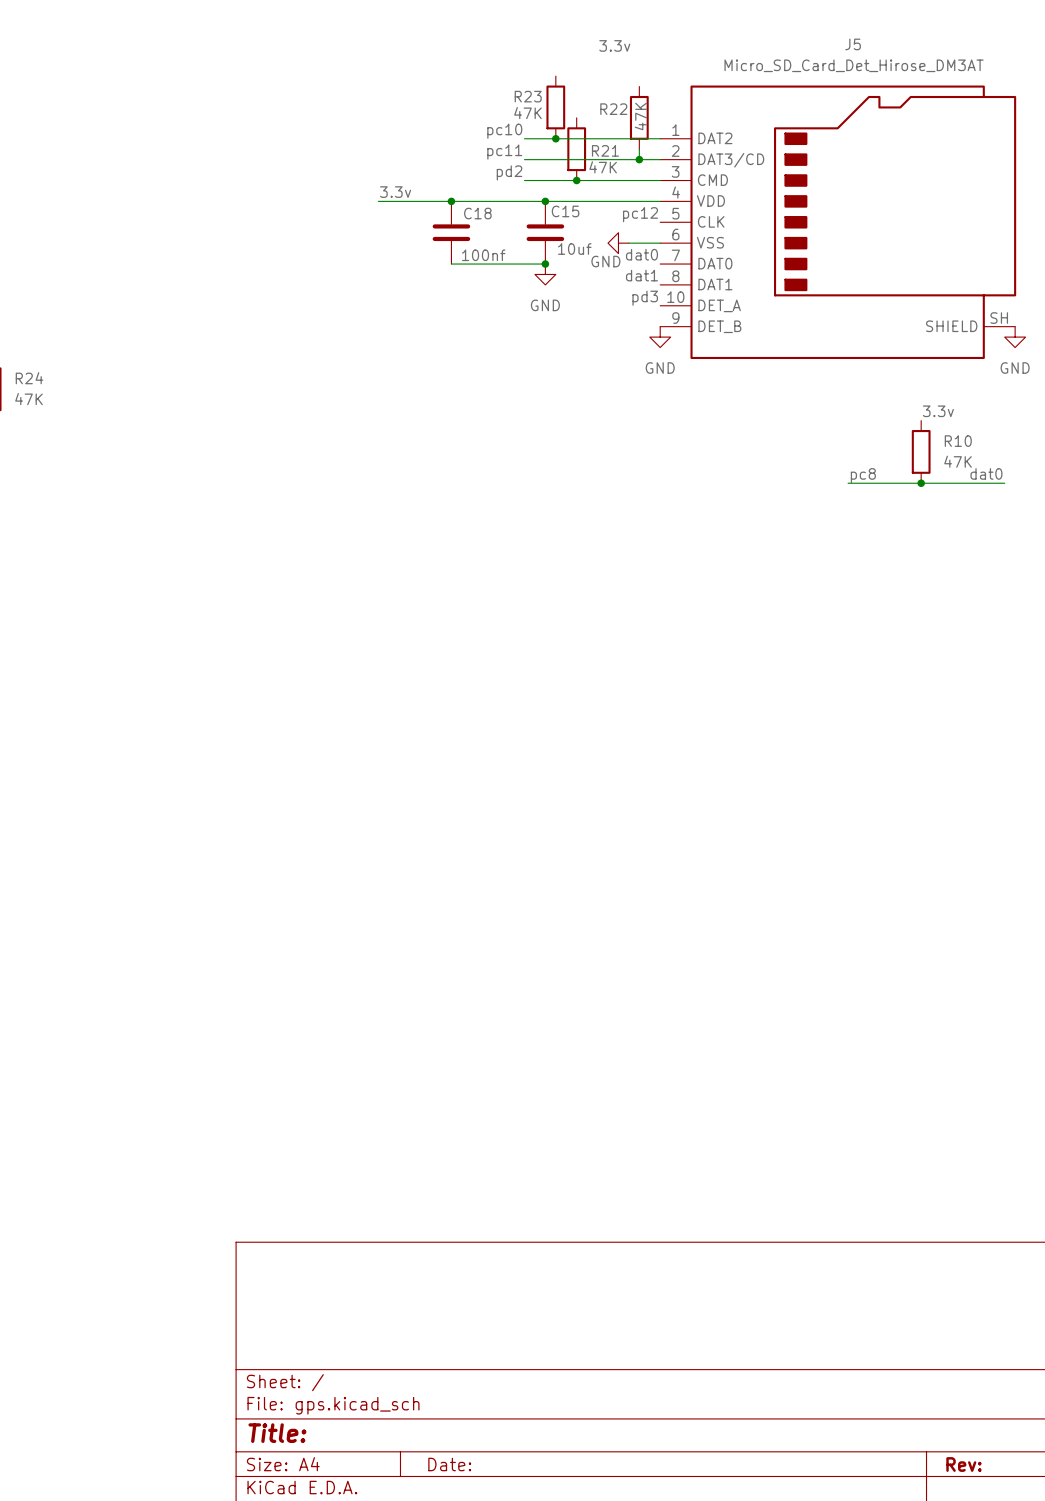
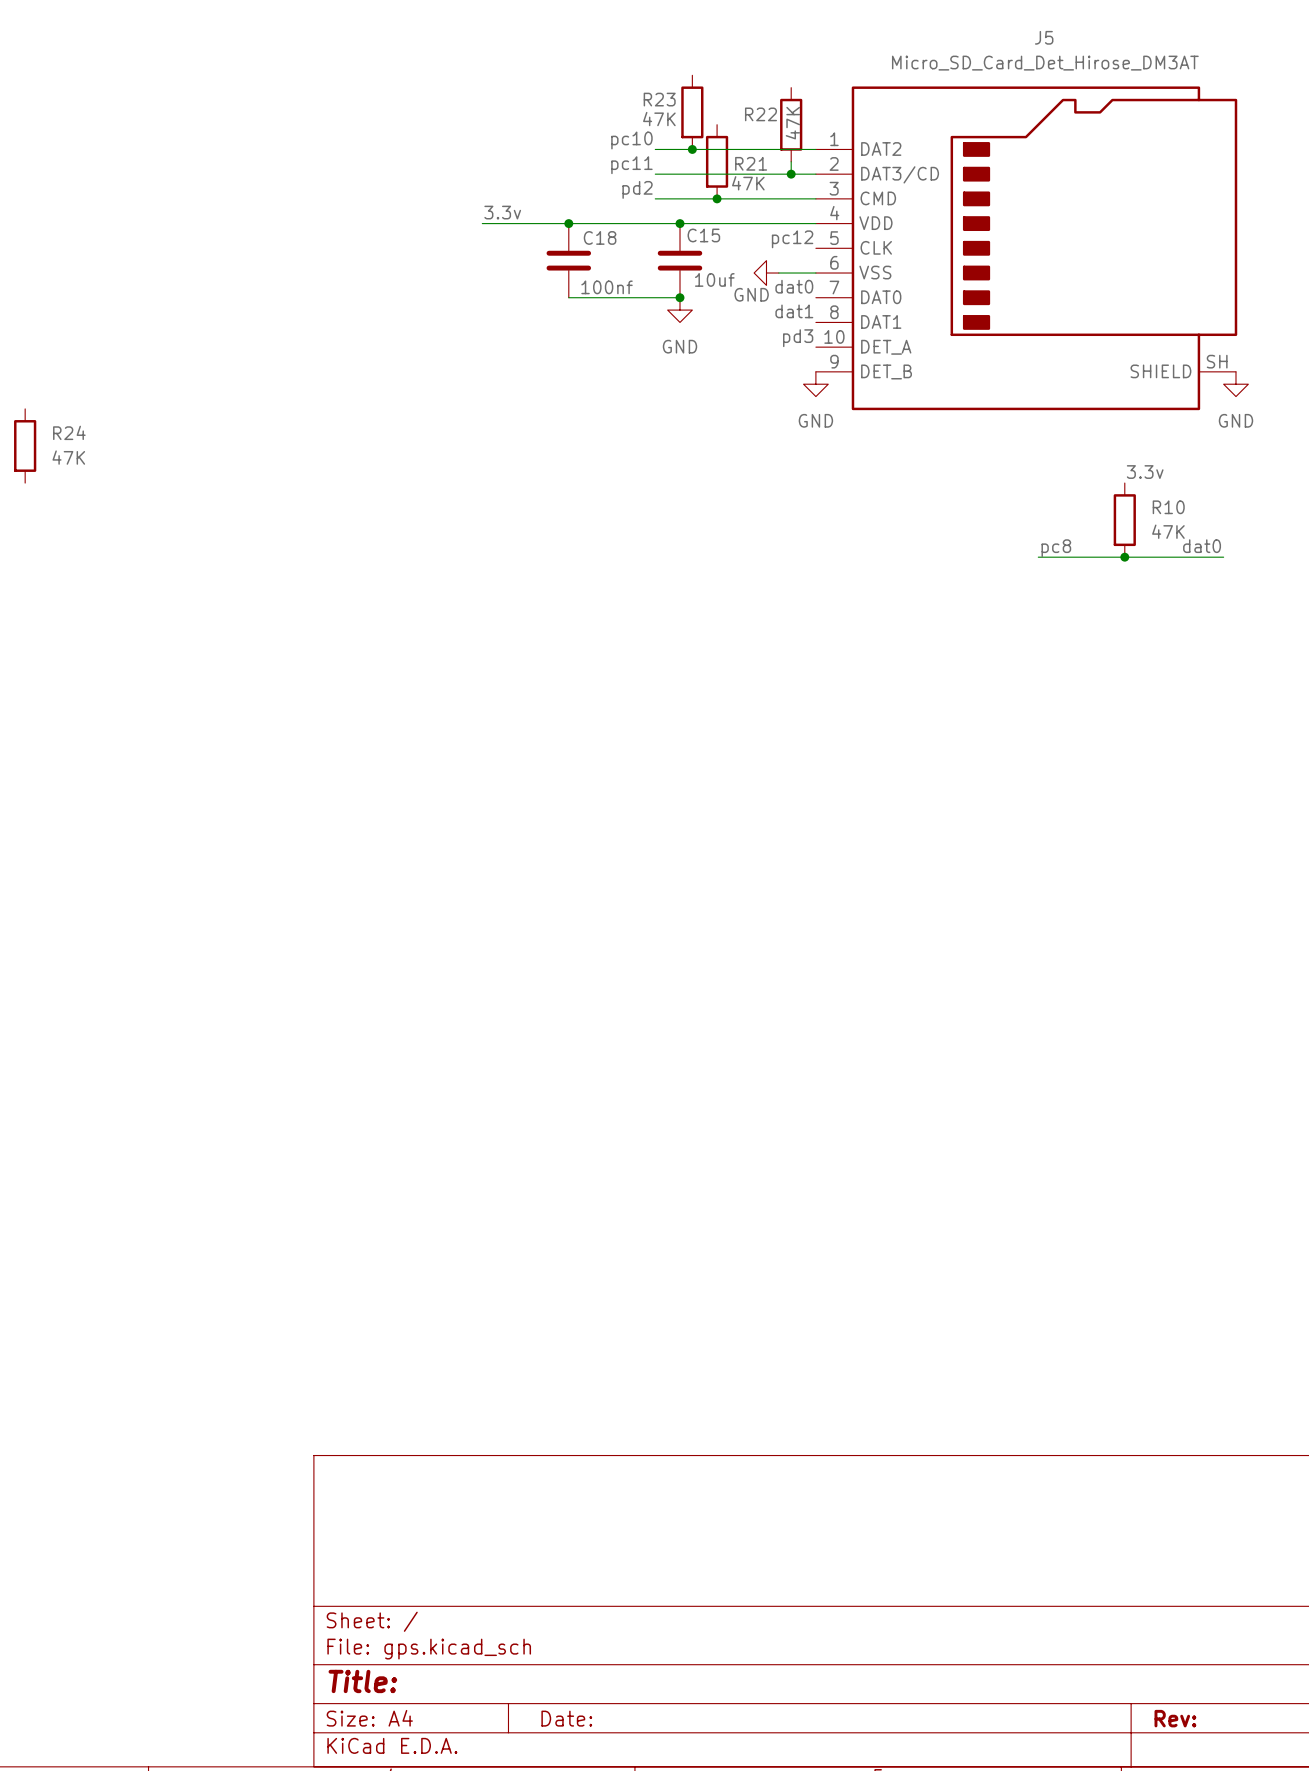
label: 3.3v (614, 45) -> none

